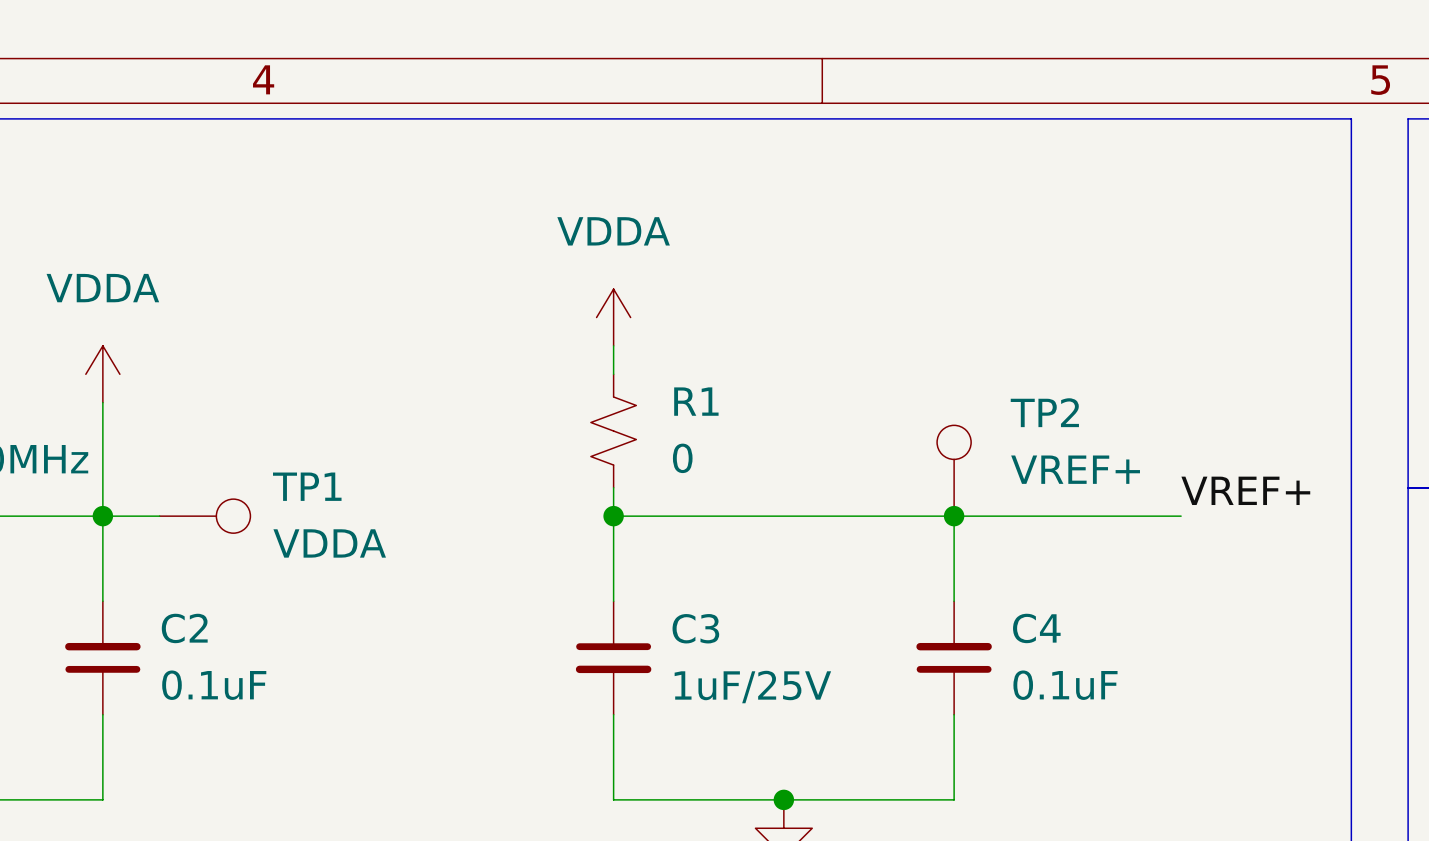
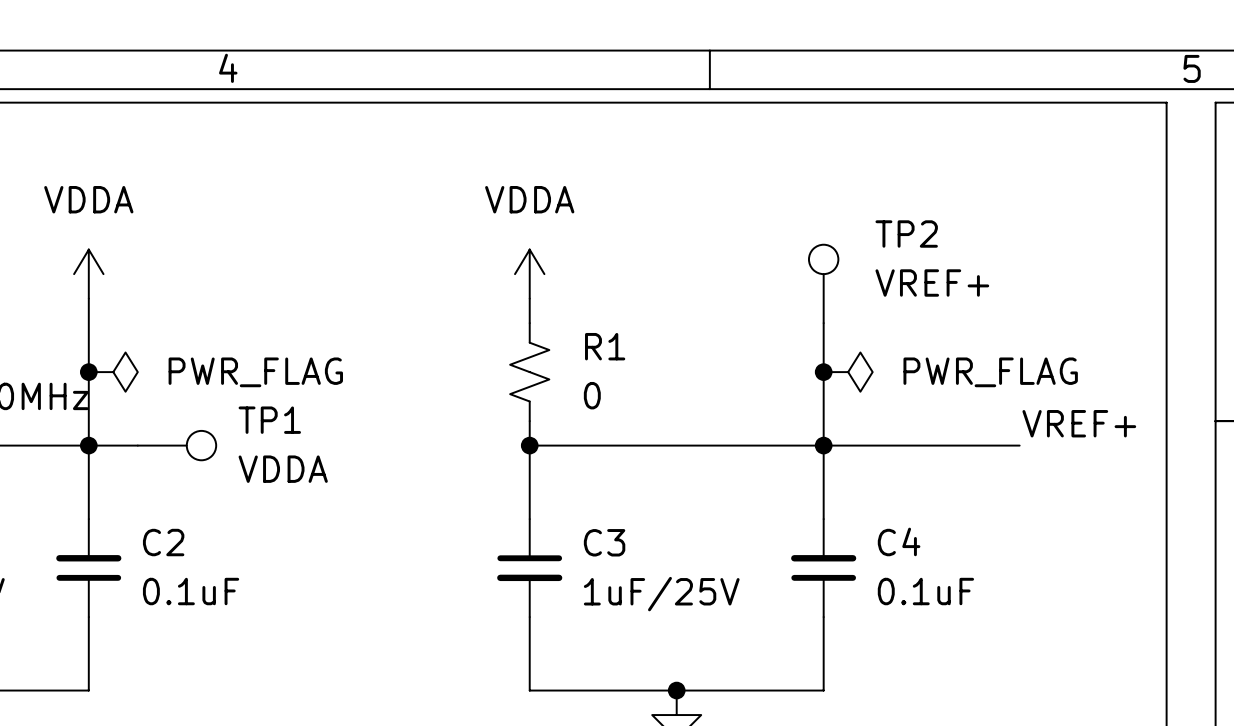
power symbol position: VDDA (102, 374) -> VDDA (88, 274)
wire: none -> (823, 323) (823, 445)
junction: none -> (88, 372)
power symbol: none -> PWR_FLAG (113, 372)
junction: none -> (823, 372)
power symbol: none -> PWR_FLAG (848, 372)
TP2 position: (954, 470) -> (823, 283)

